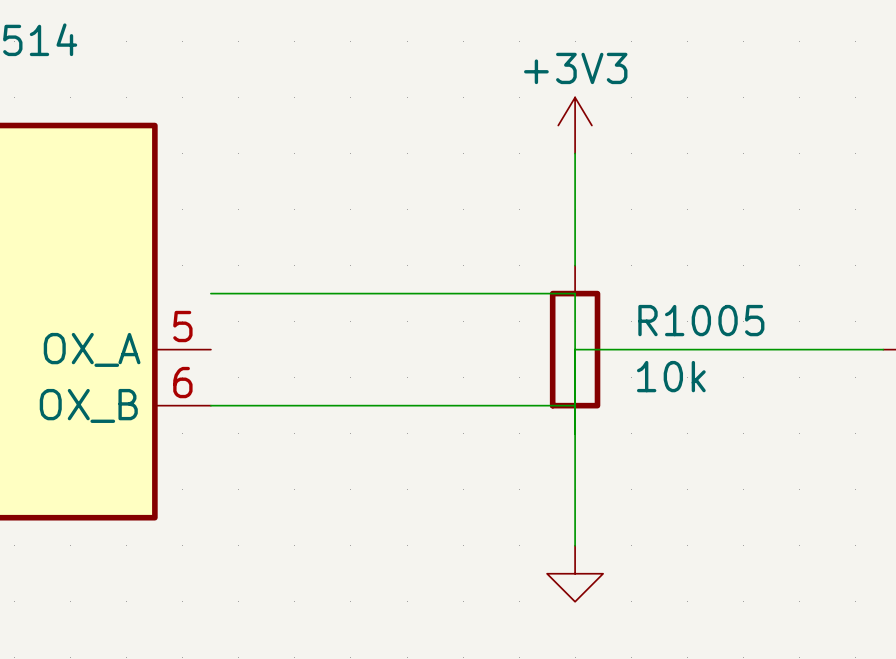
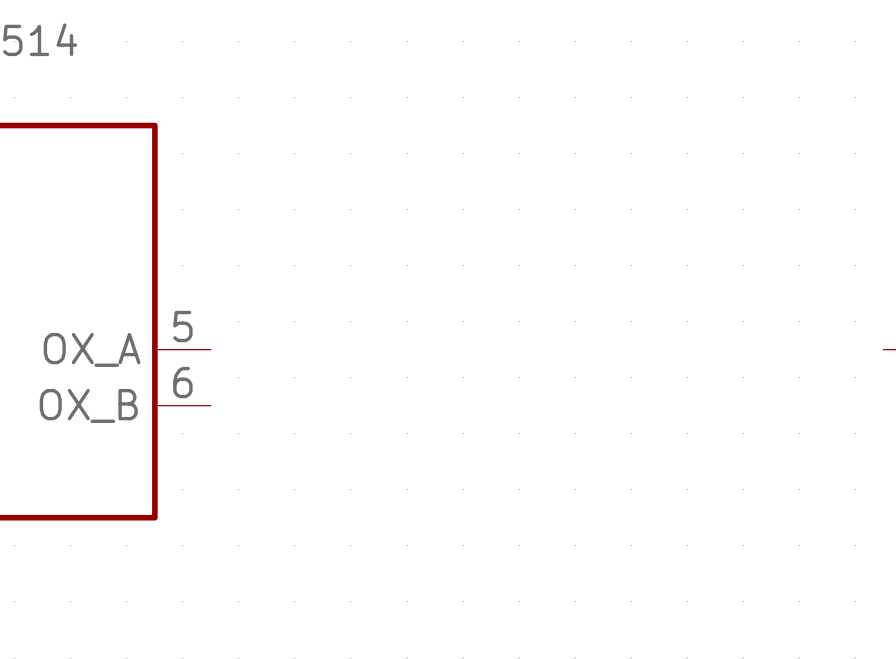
power symbol: +3V3 (575, 125) -> none
wire: (575, 153) (575, 265) -> none
wire: (210, 293) (575, 293) (575, 545) -> none
wire: (575, 349) (883, 349) -> none
R1005: 10k (575, 349) -> none
wire: (210, 405) (575, 405) -> none
power symbol: (575, 573) -> none

